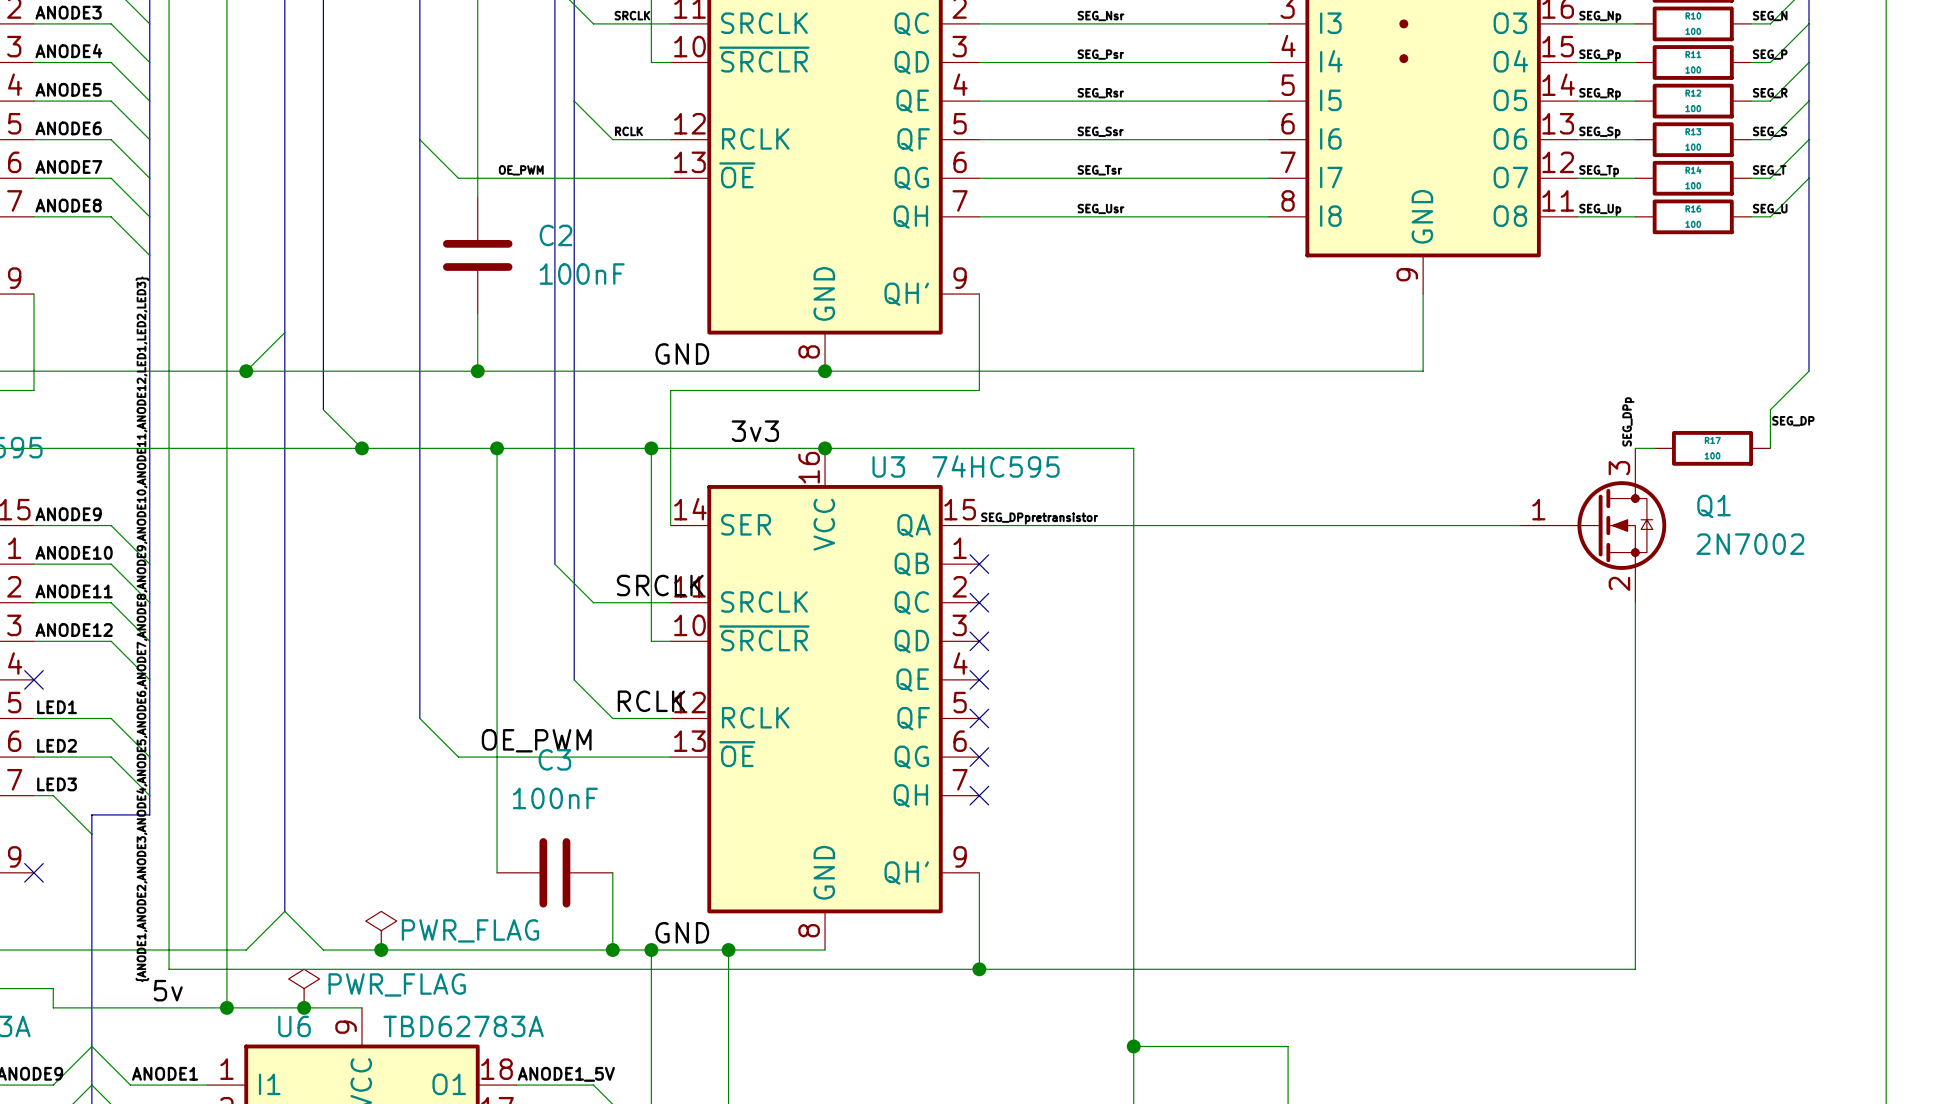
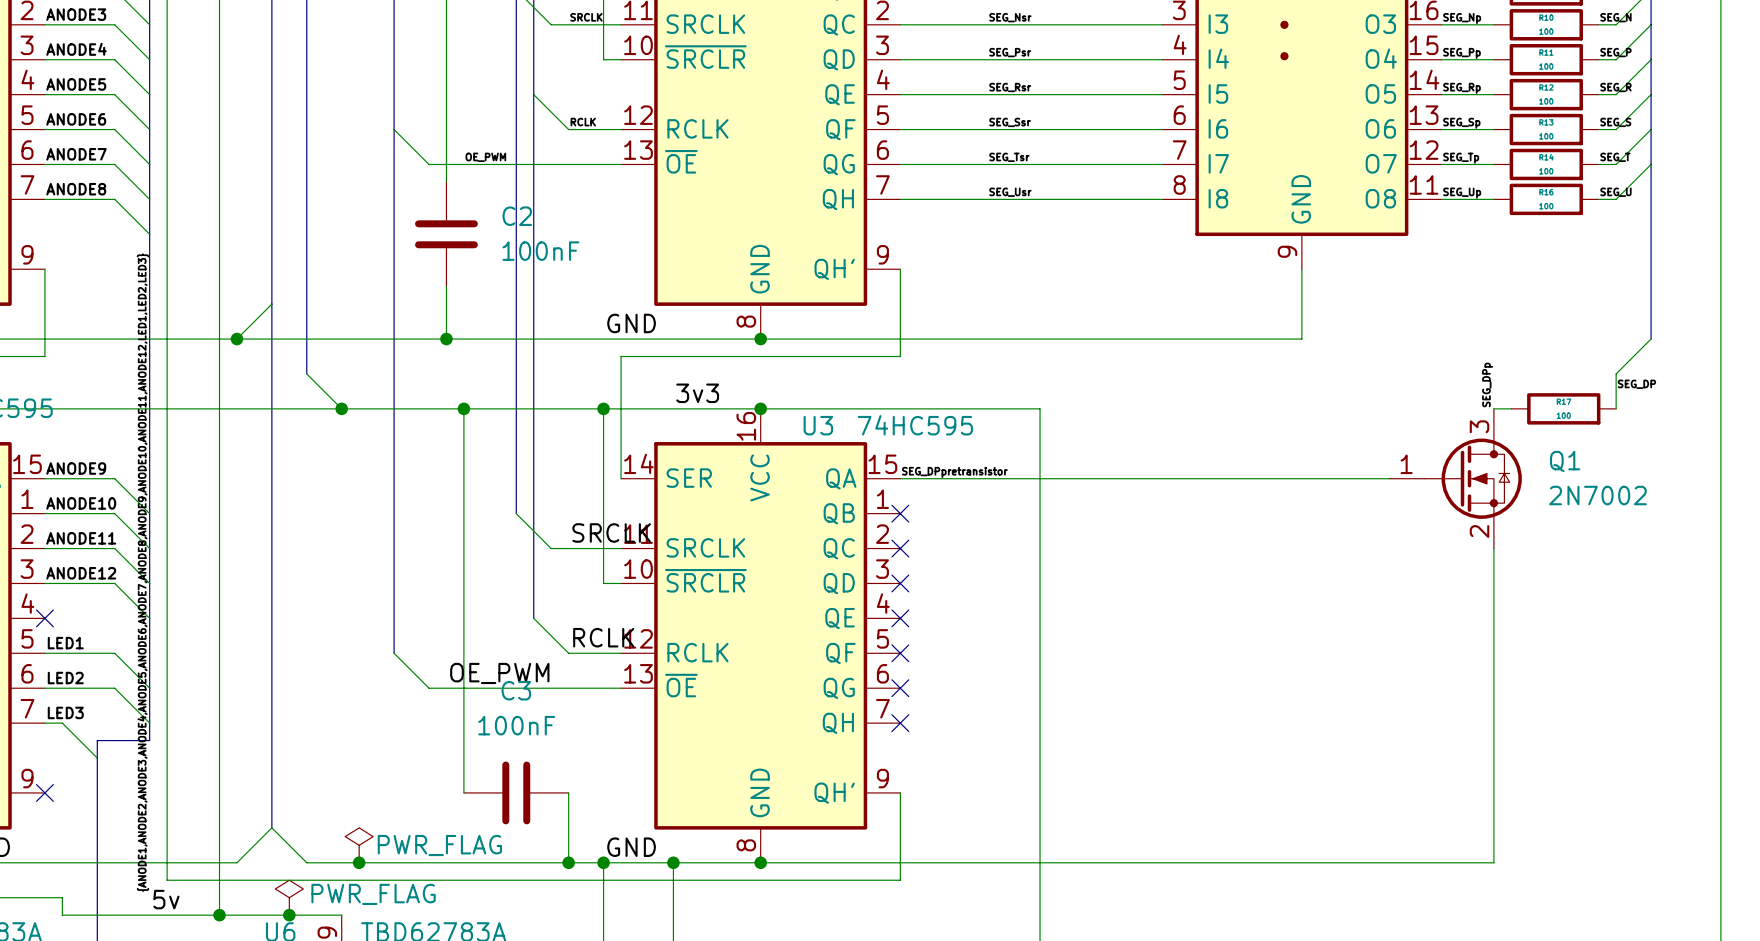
junction: none -> (760, 862)
wire: (1635, 950) (1635, 969) (979, 969) -> (1493, 862) (760, 862)
junction: (979, 969) -> none

